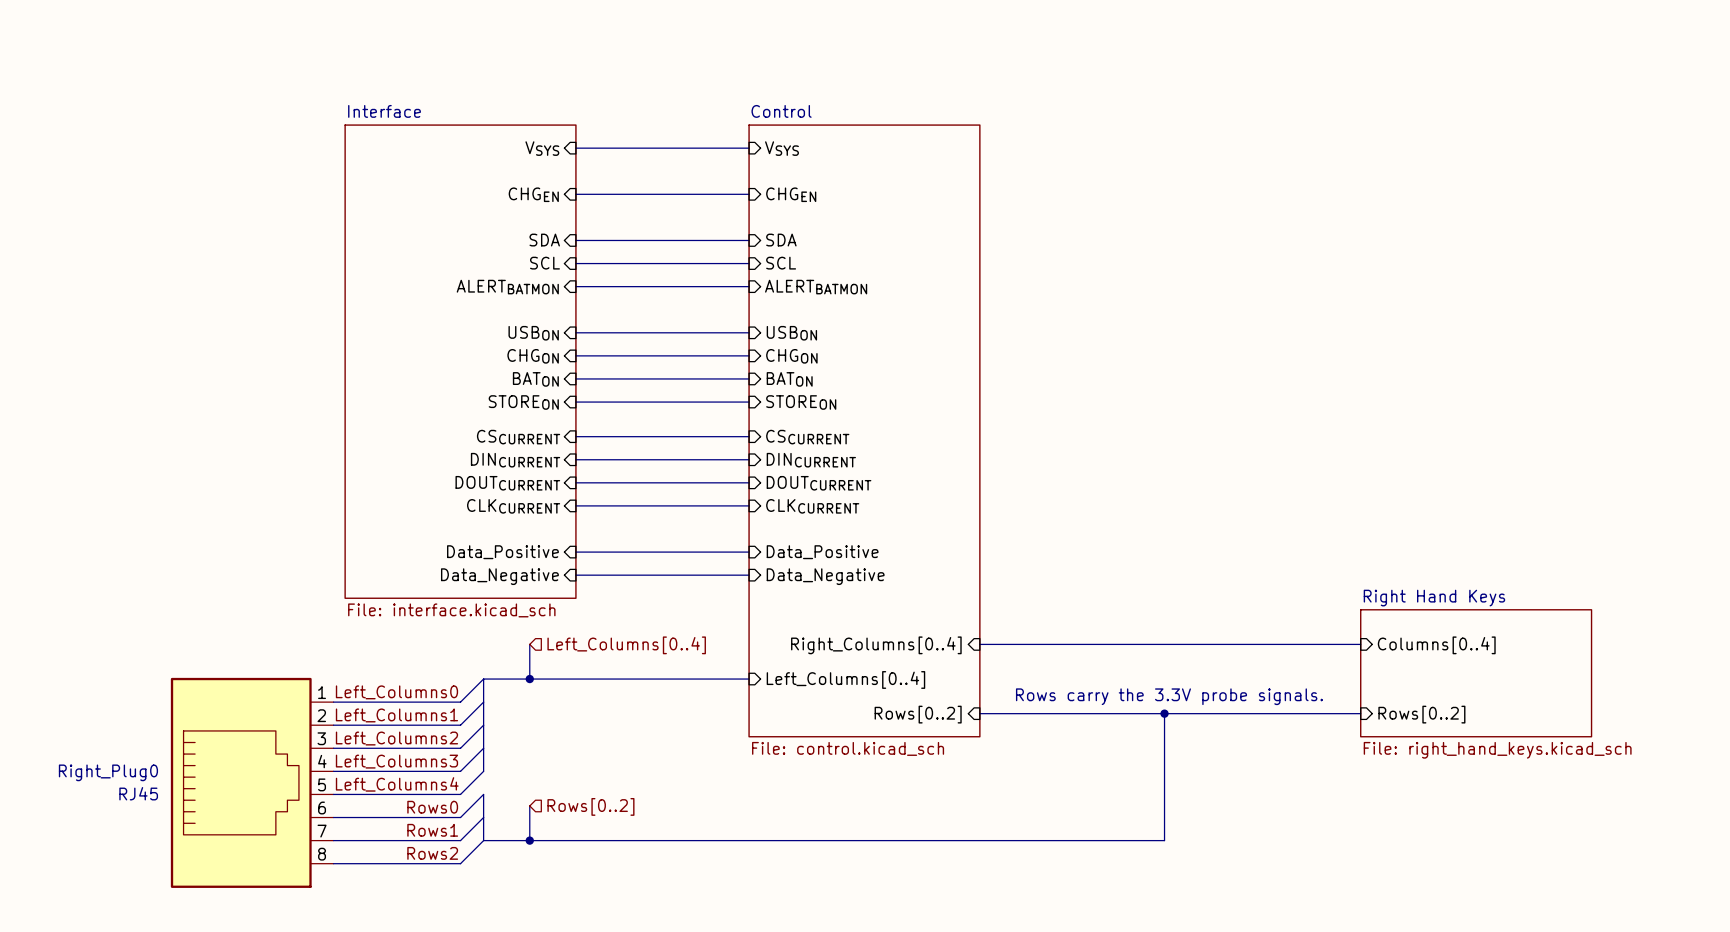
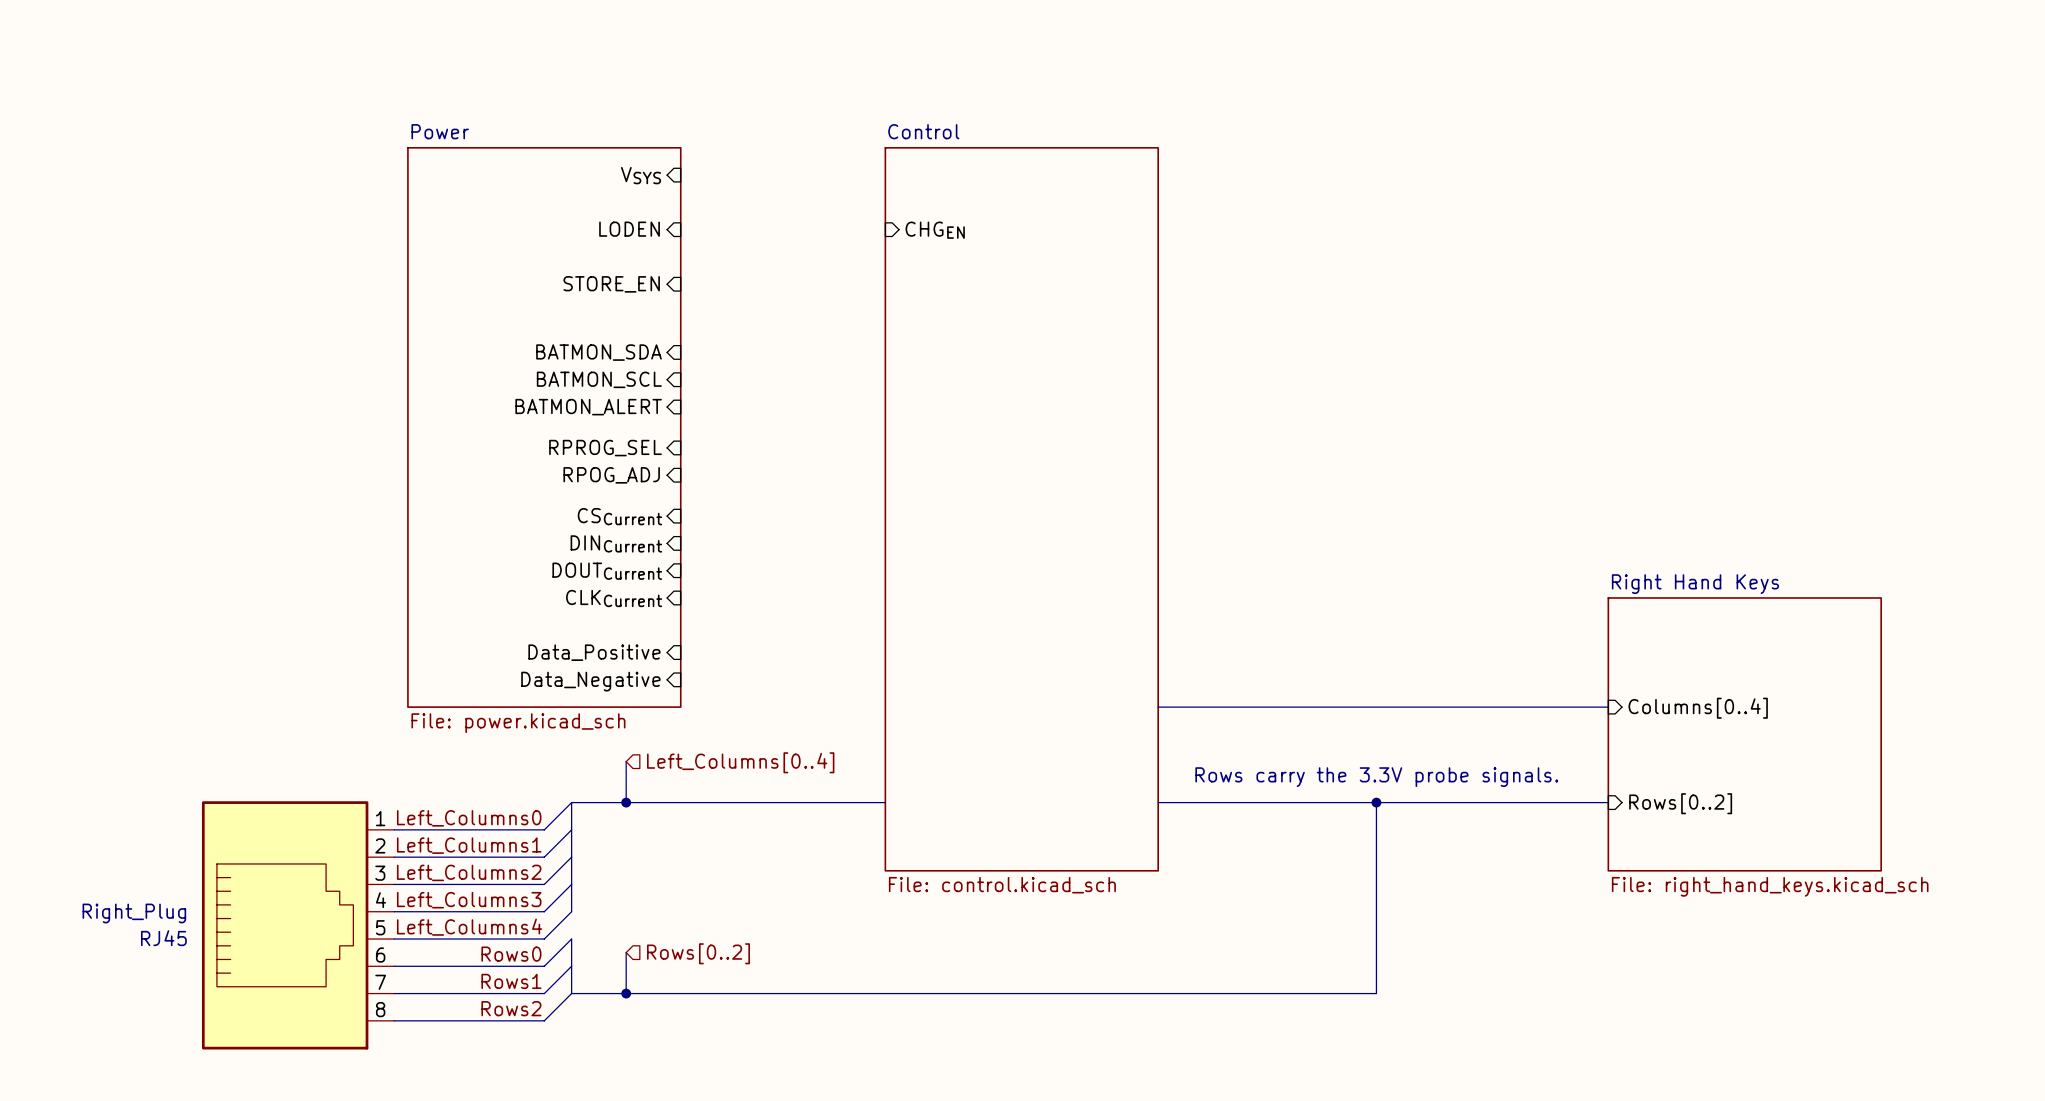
sheet Interface name: Interface (384, 111) -> Power (440, 131)
wire: (575, 148) (749, 148) -> none
sheet pin: VSYS (781, 148) -> none
sheet pin: CHGEN (533, 194) -> LODEN (629, 229)
wire: (575, 194) (749, 194) -> none
sheet pin: SDA (544, 240) -> STORE_EN (611, 284)
wire: (575, 240) (749, 240) -> none
sheet pin: SDA (781, 240) -> none
sheet pin: SCL (544, 263) -> none
wire: (575, 263) (749, 263) -> none
sheet pin: SCL (781, 263) -> none
wire: (575, 286) (749, 286) -> none
sheet pin: ALERTBATMON (507, 287) -> none
sheet pin: ALERTBATMON (816, 287) -> none
sheet pin: none -> BATMON_SDA (599, 352)
sheet pin: none -> BATMON_SCL (599, 379)
wire: (575, 332) (749, 332) -> none
sheet pin: USBON (533, 333) -> none
sheet pin: USBON (791, 333) -> none
sheet pin: none -> BATMON_ALERT (588, 407)
wire: (575, 355) (749, 355) -> none
sheet pin: CHGON (533, 356) -> none
sheet pin: CHGON (791, 356) -> none
wire: (575, 378) (749, 378) -> none
sheet pin: BATON (535, 379) -> RPROG_SEL (605, 448)
sheet pin: BATON (789, 379) -> none
sheet pin: STOREON (523, 402) -> RPOG_ADJ (611, 475)
wire: (575, 402) (749, 402) -> none
sheet pin: STOREON (801, 402) -> none
wire: (575, 436) (749, 436) -> none
sheet pin: CSCURRENT (518, 437) -> CSCurrent (619, 516)
sheet pin: CSCURRENT (807, 437) -> none
wire: (575, 459) (749, 459) -> none
sheet pin: DINCURRENT (515, 460) -> DINCurrent (616, 543)
sheet pin: DINCURRENT (811, 460) -> none
wire: (575, 482) (749, 482) -> none
sheet pin: DOUTCURRENT (507, 483) -> DOUTCurrent (607, 571)
sheet pin: DOUTCURRENT (819, 483) -> none
wire: (575, 505) (749, 505) -> none
sheet pin: CLKCURRENT (513, 506) -> CLKCurrent (614, 598)
sheet pin: CLKCURRENT (812, 506) -> none
wire: (575, 552) (749, 552) -> none
sheet pin: Data_Positive (822, 552) -> none
wire: (575, 575) (749, 575) -> none
sheet pin: Data_Negative (825, 576) -> none
sheet Interface value: File: interface.kicad_sch (451, 610) -> File: power.kicad_sch (518, 723)
sheet Right Hand Keys: none -> File: right_hand_keys.kicad_sch (1744, 734)
bus: (979, 644) (1360, 644) -> (1158, 802) (1608, 802)
sheet pin: Right_Columns[0..4] (876, 645) -> none
sheet pin position: Columns[0..4] (1436, 645) -> Columns[0..4] (1698, 708)
sheet Right Hand Keys: File: right_hand_keys.kicad_sch (1476, 673) -> none
sheet pin: Left_Columns[0..4] (845, 679) -> none
bus: none -> (1376, 802) (1376, 843)
text position: Rows carry the 3.3V probe signals. (1169, 696) -> Rows carry the 3.3V probe signals. (1376, 777)
bus: (979, 713) (1360, 713) -> (1158, 707) (1608, 707)
junction position: (1164, 713) -> (1376, 802)
sheet pin: Rows[0..2] (918, 714) -> none
sheet pin position: Rows[0..2] (1421, 714) -> Rows[0..2] (1680, 803)
Right_Plug0 name: Right_Plug0 (108, 772) -> Right_Plug (134, 913)

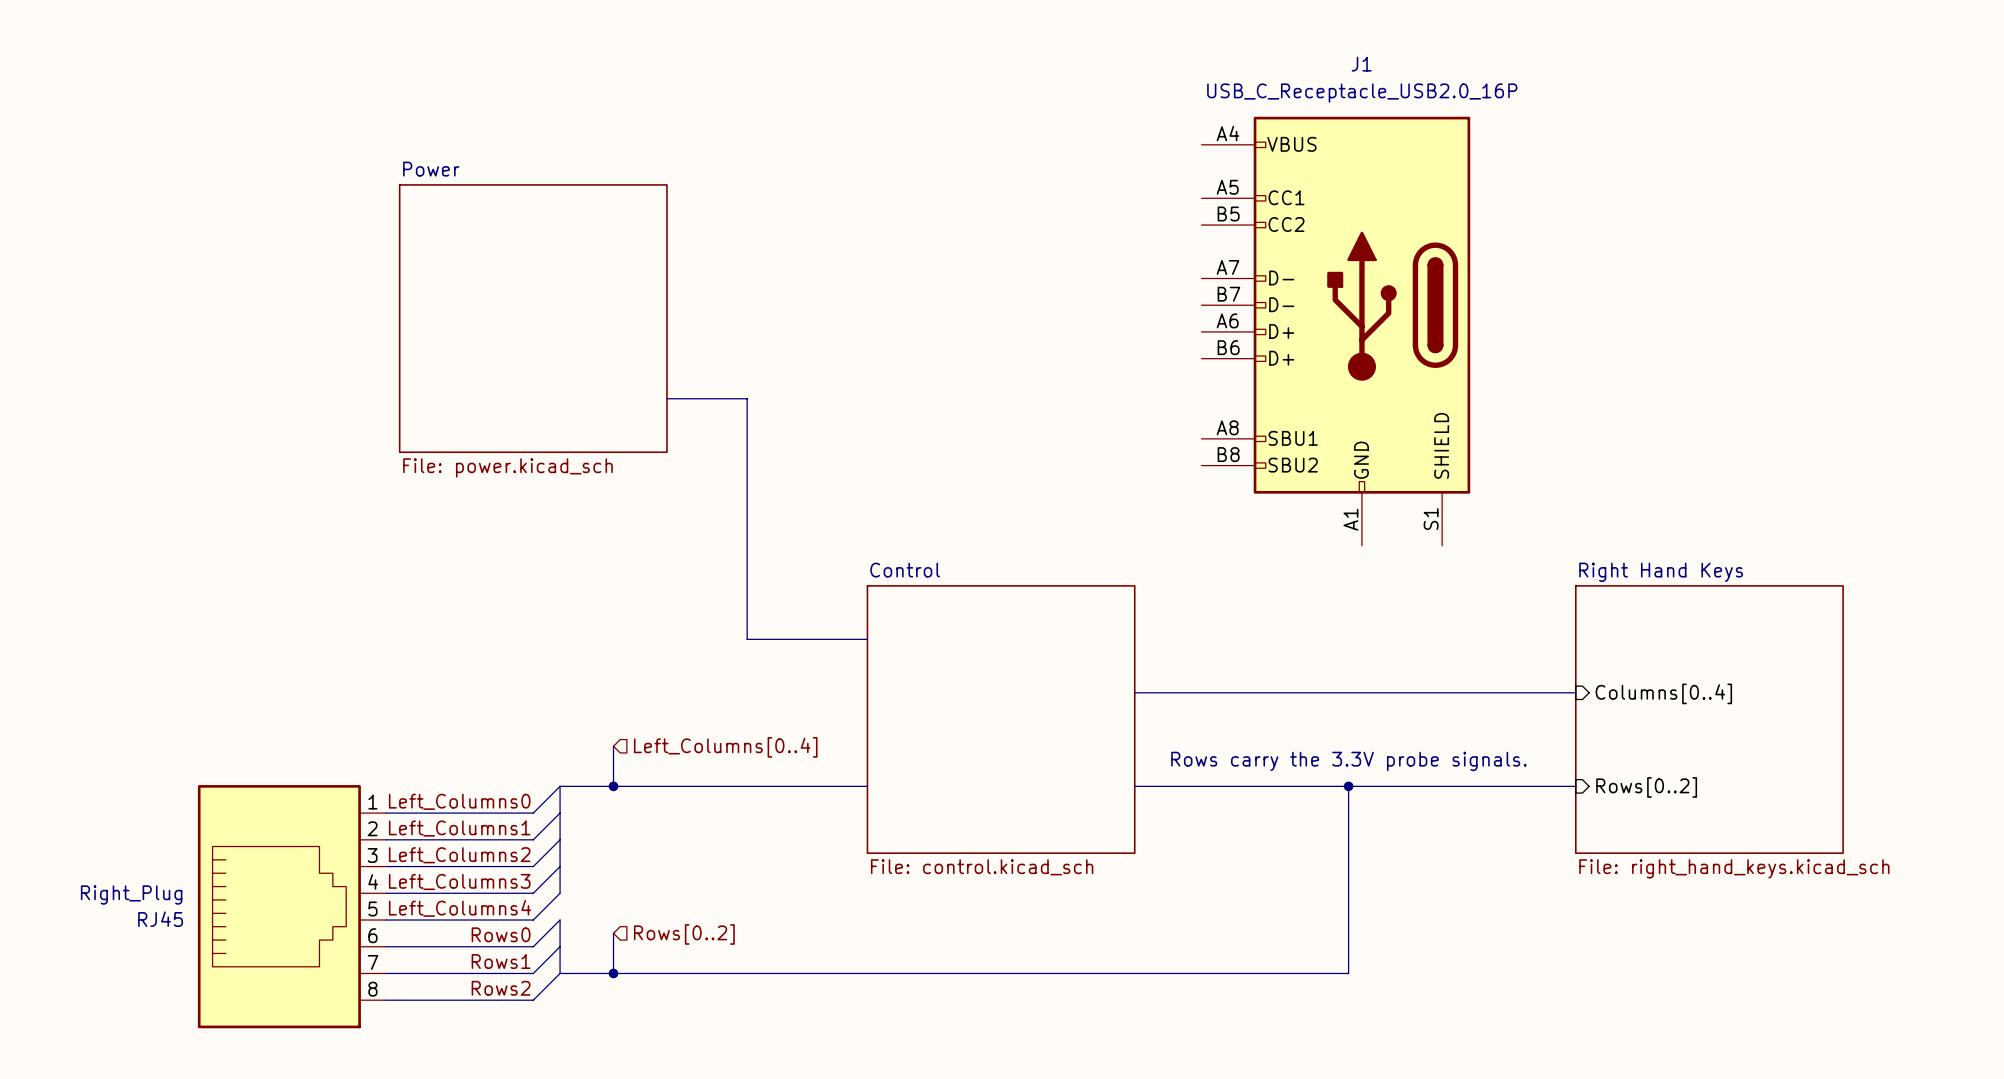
sheet pin: VSYS (641, 175) -> none
sheet pin: LODEN (629, 229) -> none
sheet pin: CHGEN (935, 230) -> none
sheet pin: STORE_EN (611, 284) -> none
sheet Power: none -> File: power.kicad_sch (533, 318)
J1: none -> USB_C_Receptacle_USB2.0_16P (1335, 331)
sheet pin: BATMON_SDA (599, 352) -> none
sheet pin: BATMON_SCL (599, 379) -> none
sheet pin: BATMON_ALERT (588, 407) -> none
wire: none -> (666, 398) (747, 398) (747, 639) (867, 639)
sheet Power: File: power.kicad_sch (544, 427) -> none
sheet pin: RPROG_SEL (605, 448) -> none
sheet pin: RPOG_ADJ (611, 475) -> none
sheet Control: File: control.kicad_sch (1021, 509) -> none
sheet pin: CSCurrent (619, 516) -> none
sheet pin: DINCurrent (616, 543) -> none
sheet pin: DOUTCurrent (607, 571) -> none
sheet pin: CLKCurrent (614, 598) -> none
sheet pin: Data_Positive (594, 652) -> none
sheet pin: Data_Negative (590, 681) -> none
sheet Control: none -> File: control.kicad_sch (1001, 719)

